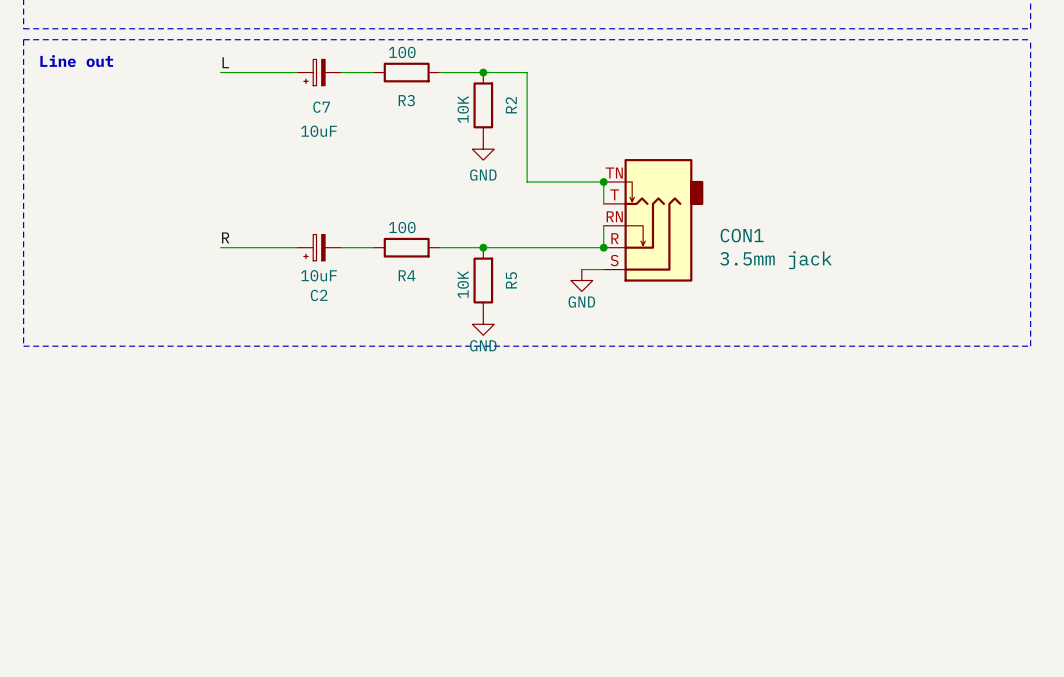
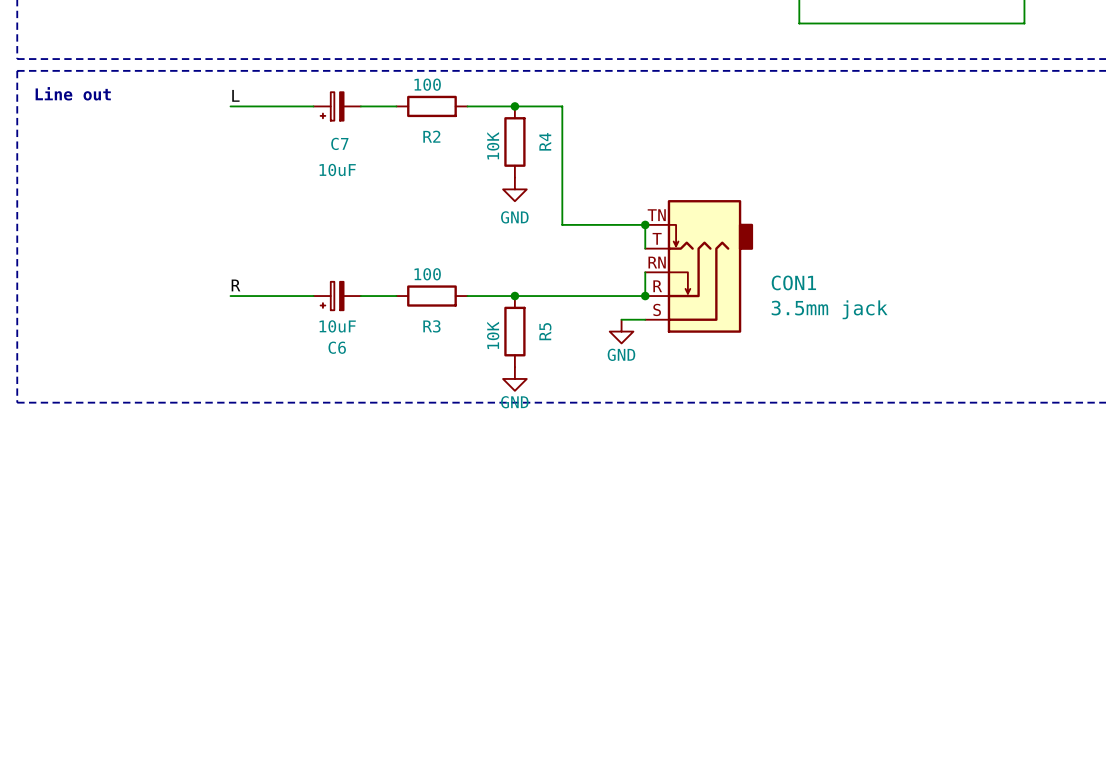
R3 name: R3 (406, 100) -> R2 (431, 136)
R2 name: R2 (511, 105) -> R4 (545, 141)
R4 name: R4 (407, 275) -> R3 (431, 326)
C2 name: C2 (319, 295) -> C6 (337, 347)

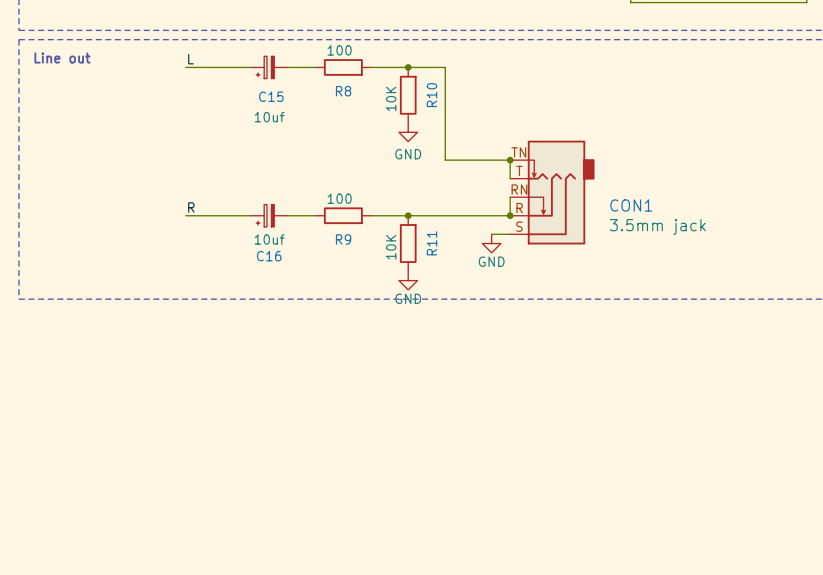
R2 name: R2 (431, 136) -> R8 (343, 91)
R4 name: R4 (545, 141) -> R10 (431, 95)
C7 name: C7 (339, 143) -> C15 (271, 96)
C7 value: 10uF (337, 169) -> 10uf (269, 117)
C6 value: 10uF (337, 326) -> 10uf (269, 239)
R3 name: R3 (431, 326) -> R9 (343, 239)
R5 name: R5 (545, 331) -> R11 (431, 243)
C6 name: C6 (337, 347) -> C16 (269, 256)

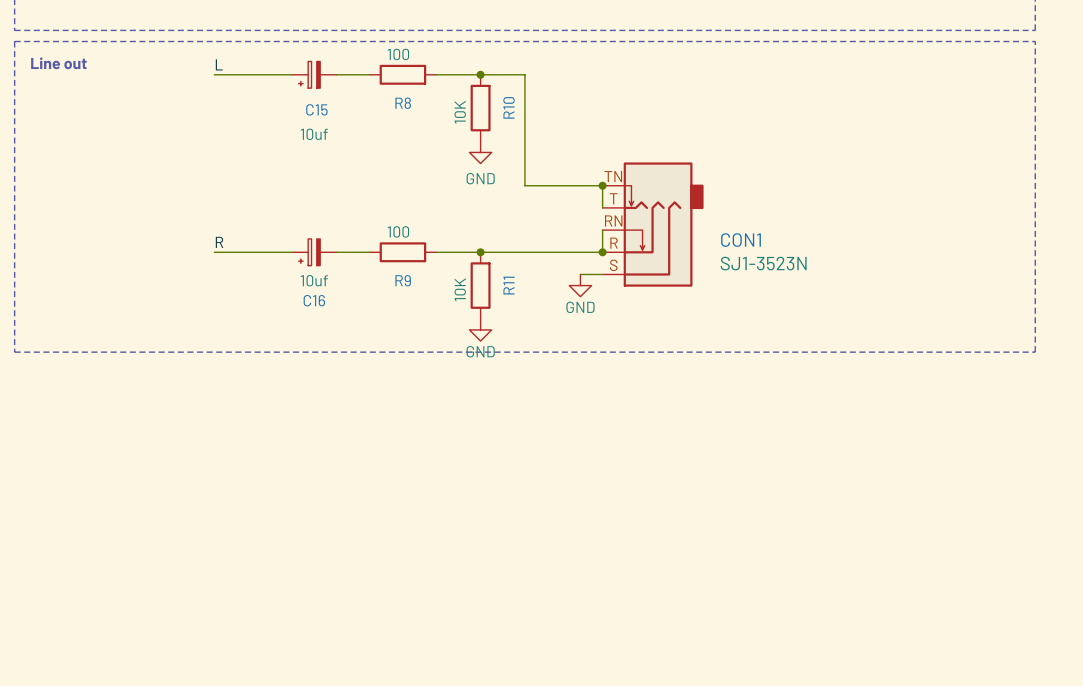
CON1 value: 3.5mm jack (657, 227) -> SJ1-3523N (763, 263)

